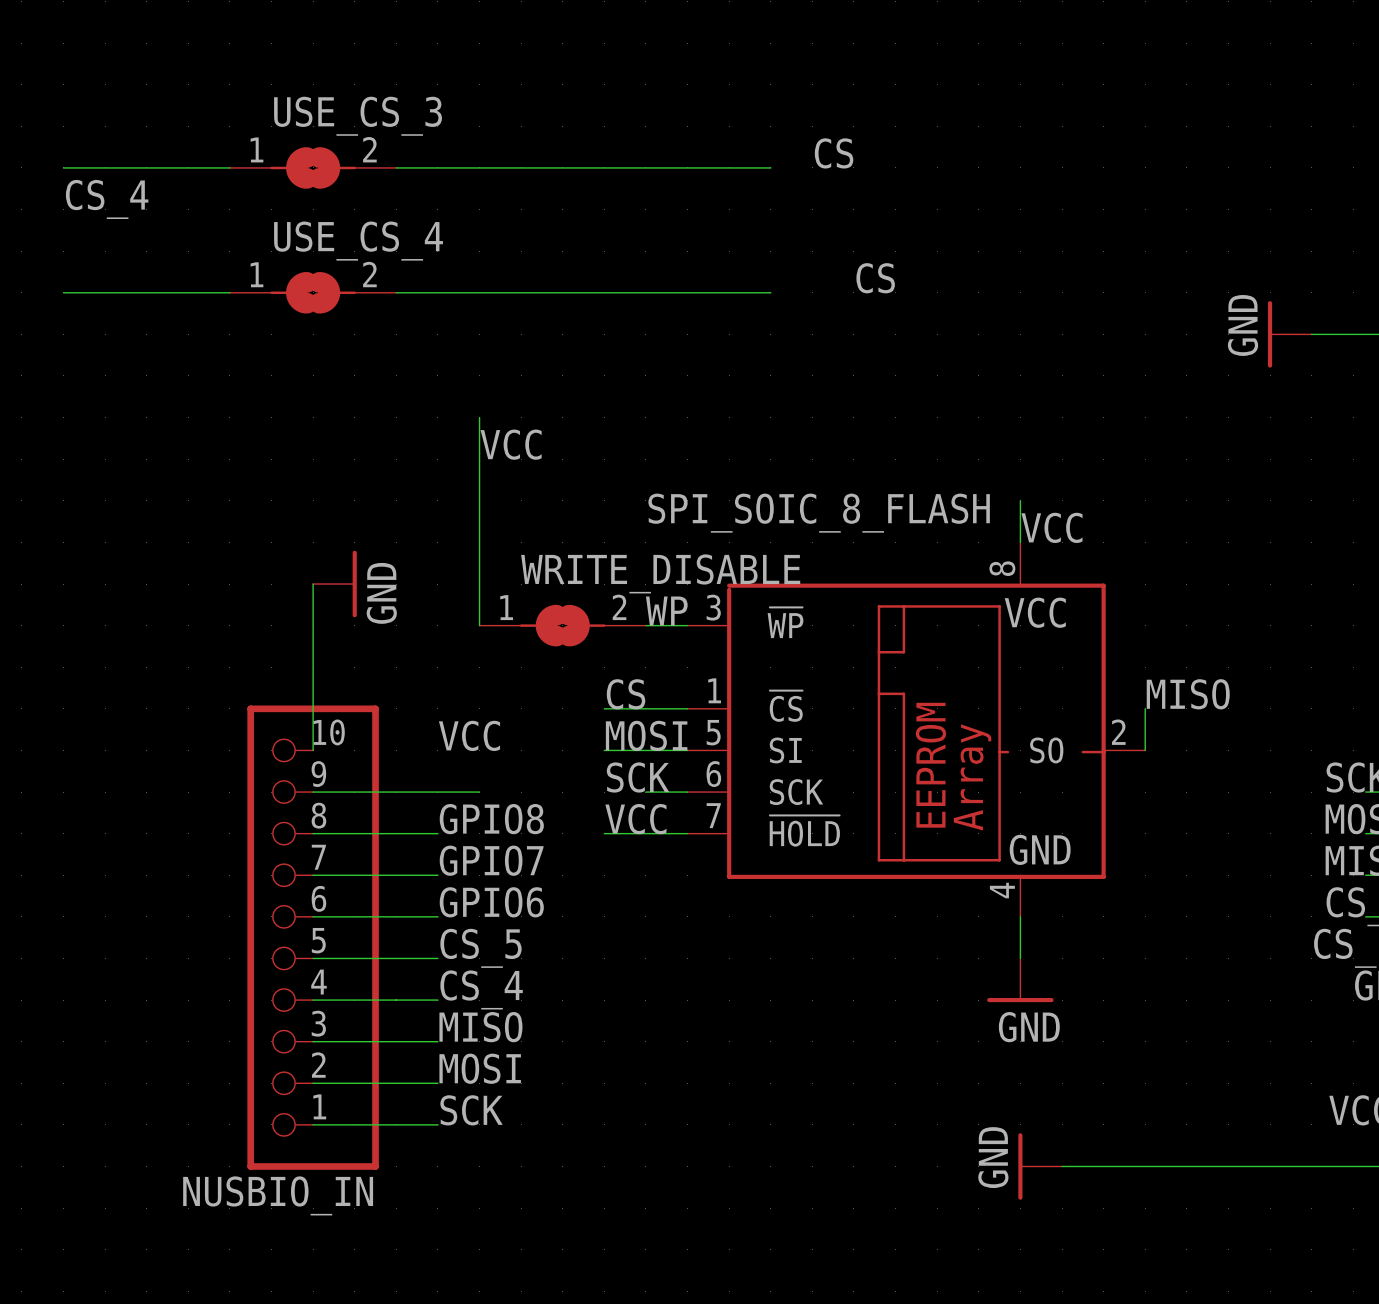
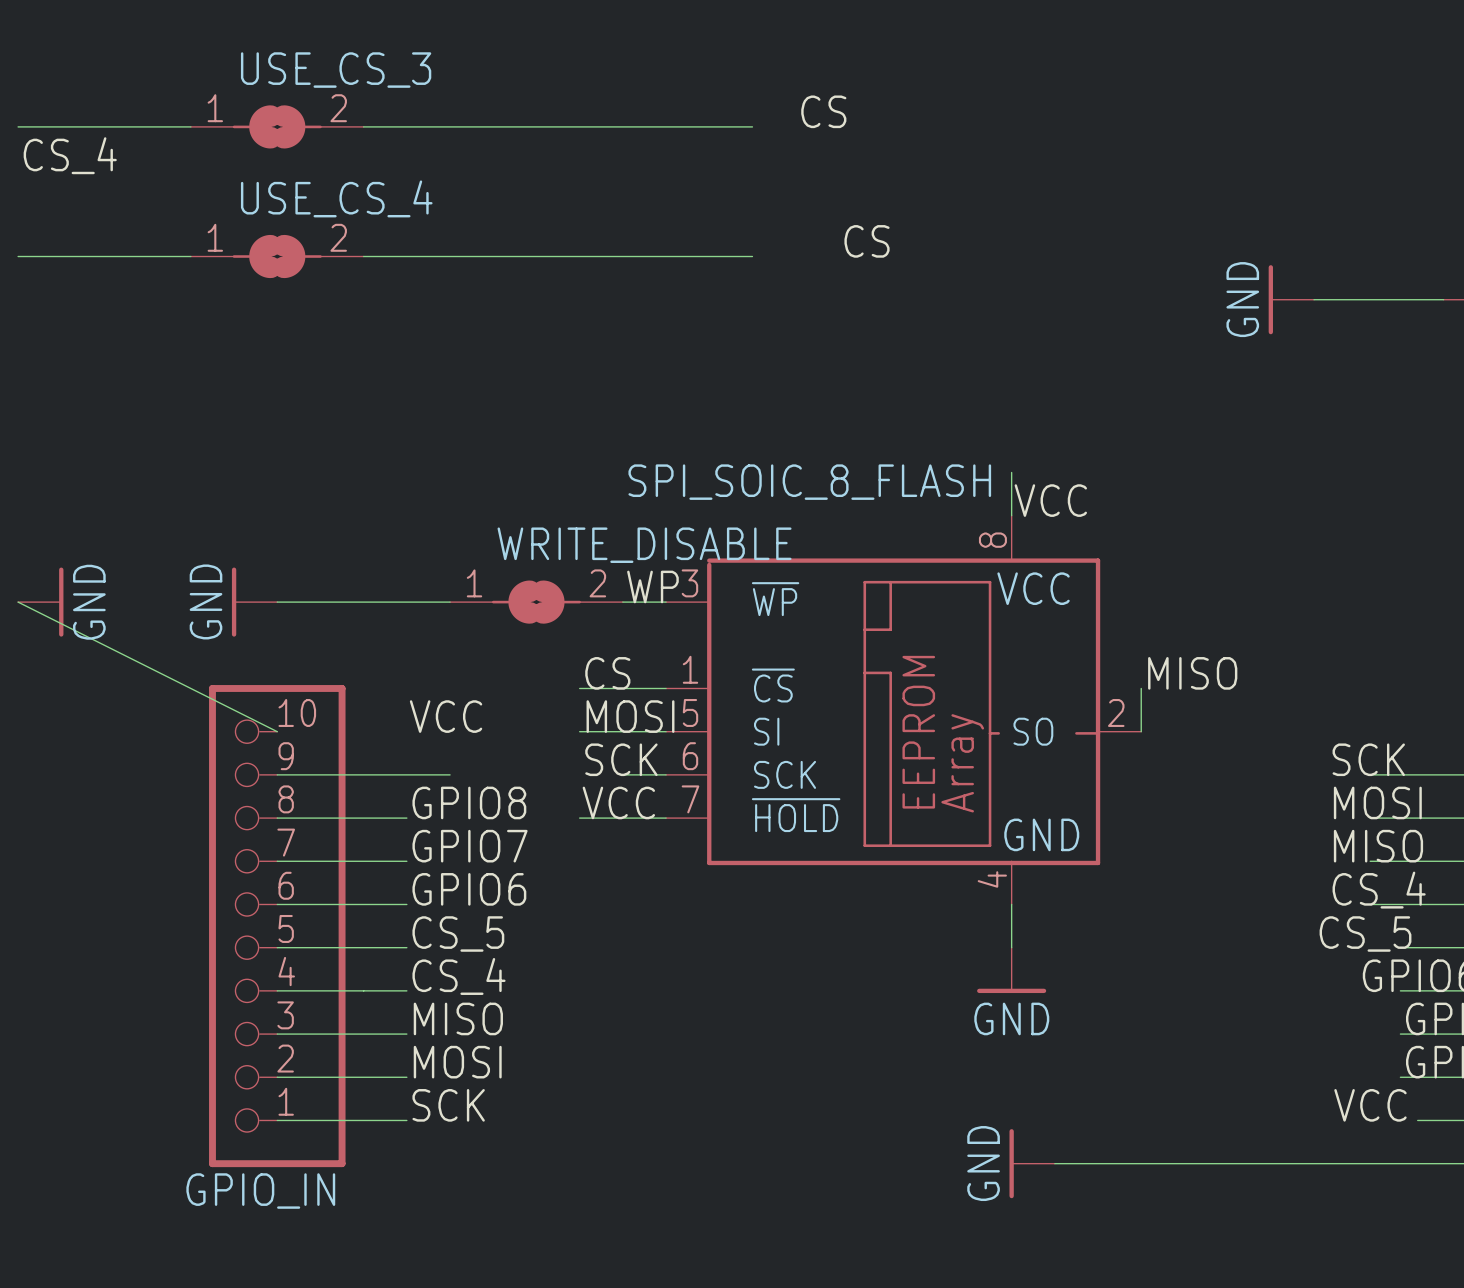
wire: (479, 417) (479, 625) -> (277, 602) (450, 602)
label: VCC (511, 444) -> none
wire: (313, 584) (313, 750) -> (18, 602) (277, 731)
power symbol position: GND (334, 584) -> GND (254, 602)
power symbol rotation: 0° (354, 584) -> 180° (234, 602)
power symbol: none -> GND (40, 602)
NUSBIO_IN name: NUSBIO_IN (278, 1195) -> GPIO_IN (260, 1191)

